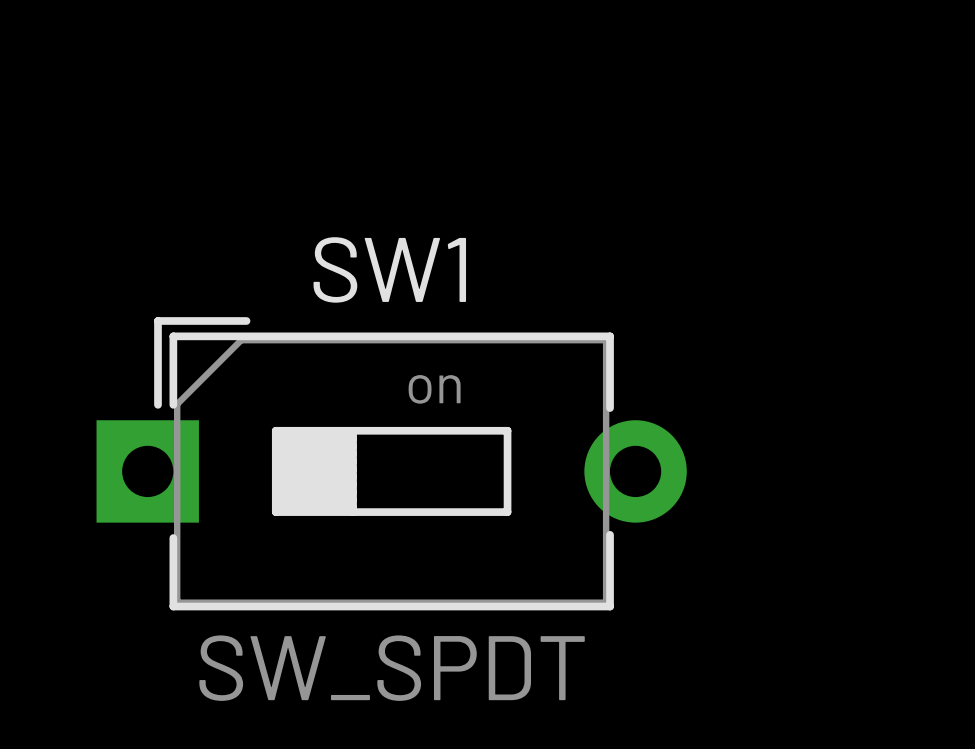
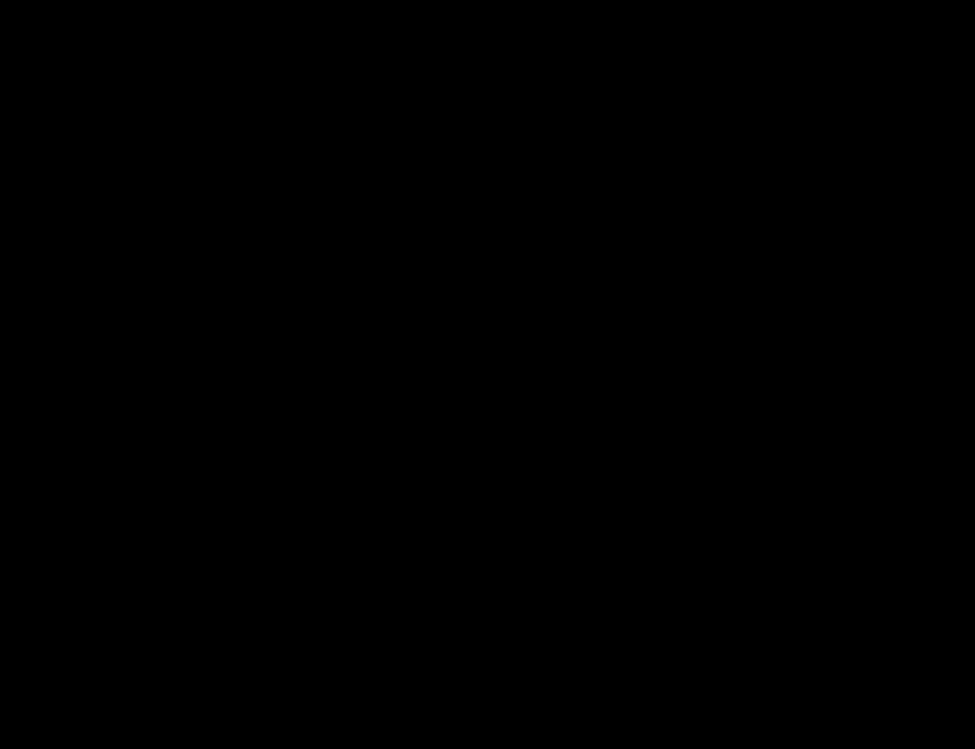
SW1: SW_SPDT (391, 463) -> none

